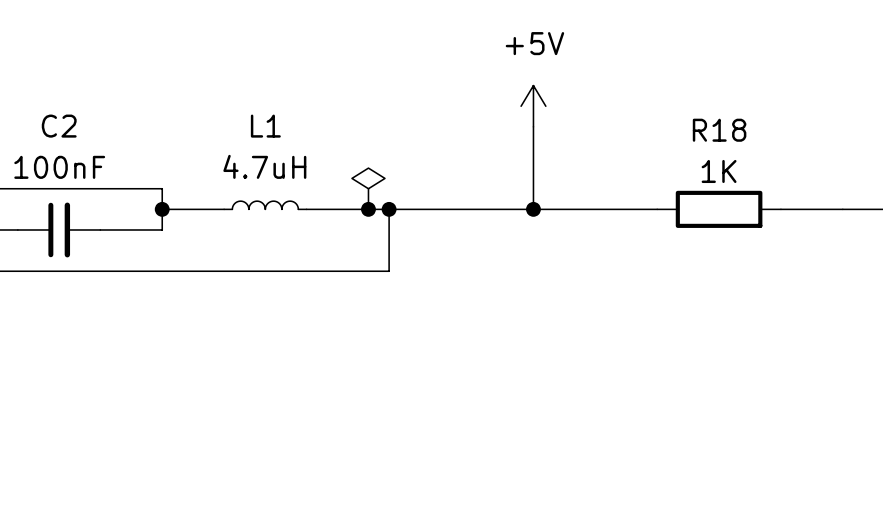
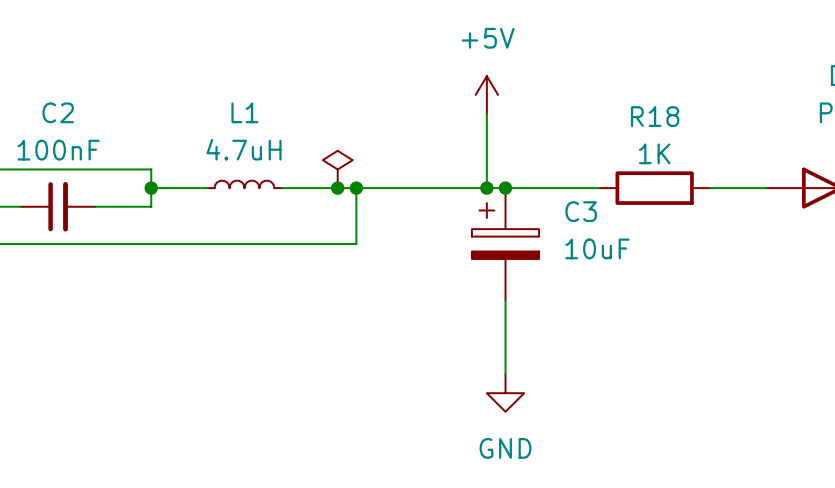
junction: none -> (505, 188)
C3: none -> 10uF (505, 244)
wire: none -> (505, 299) (505, 374)
power symbol: none -> GND (505, 393)

